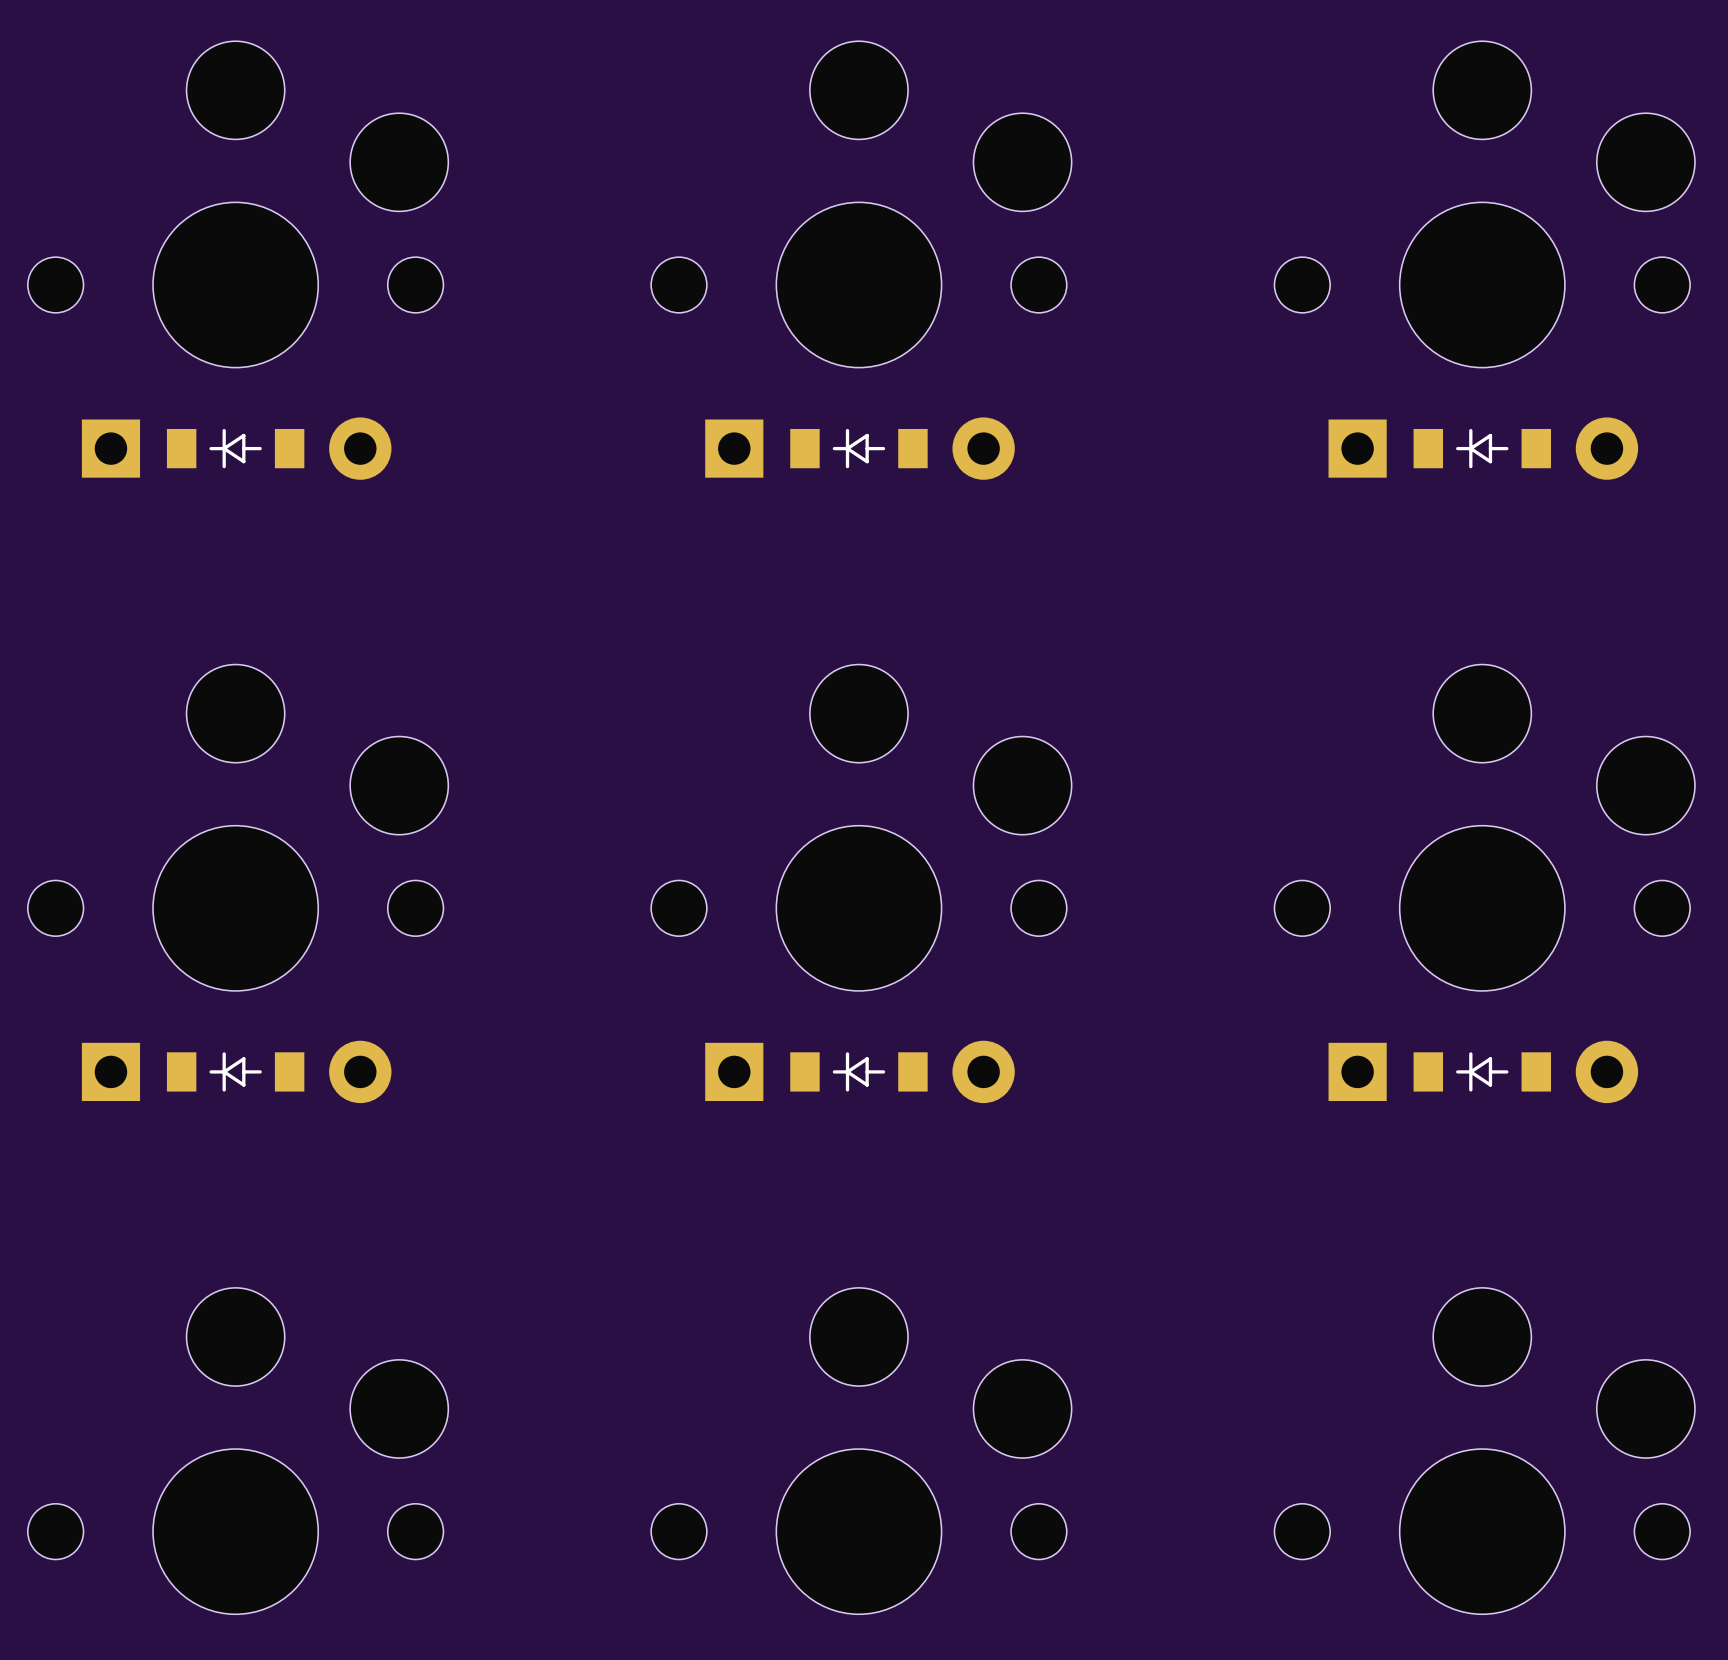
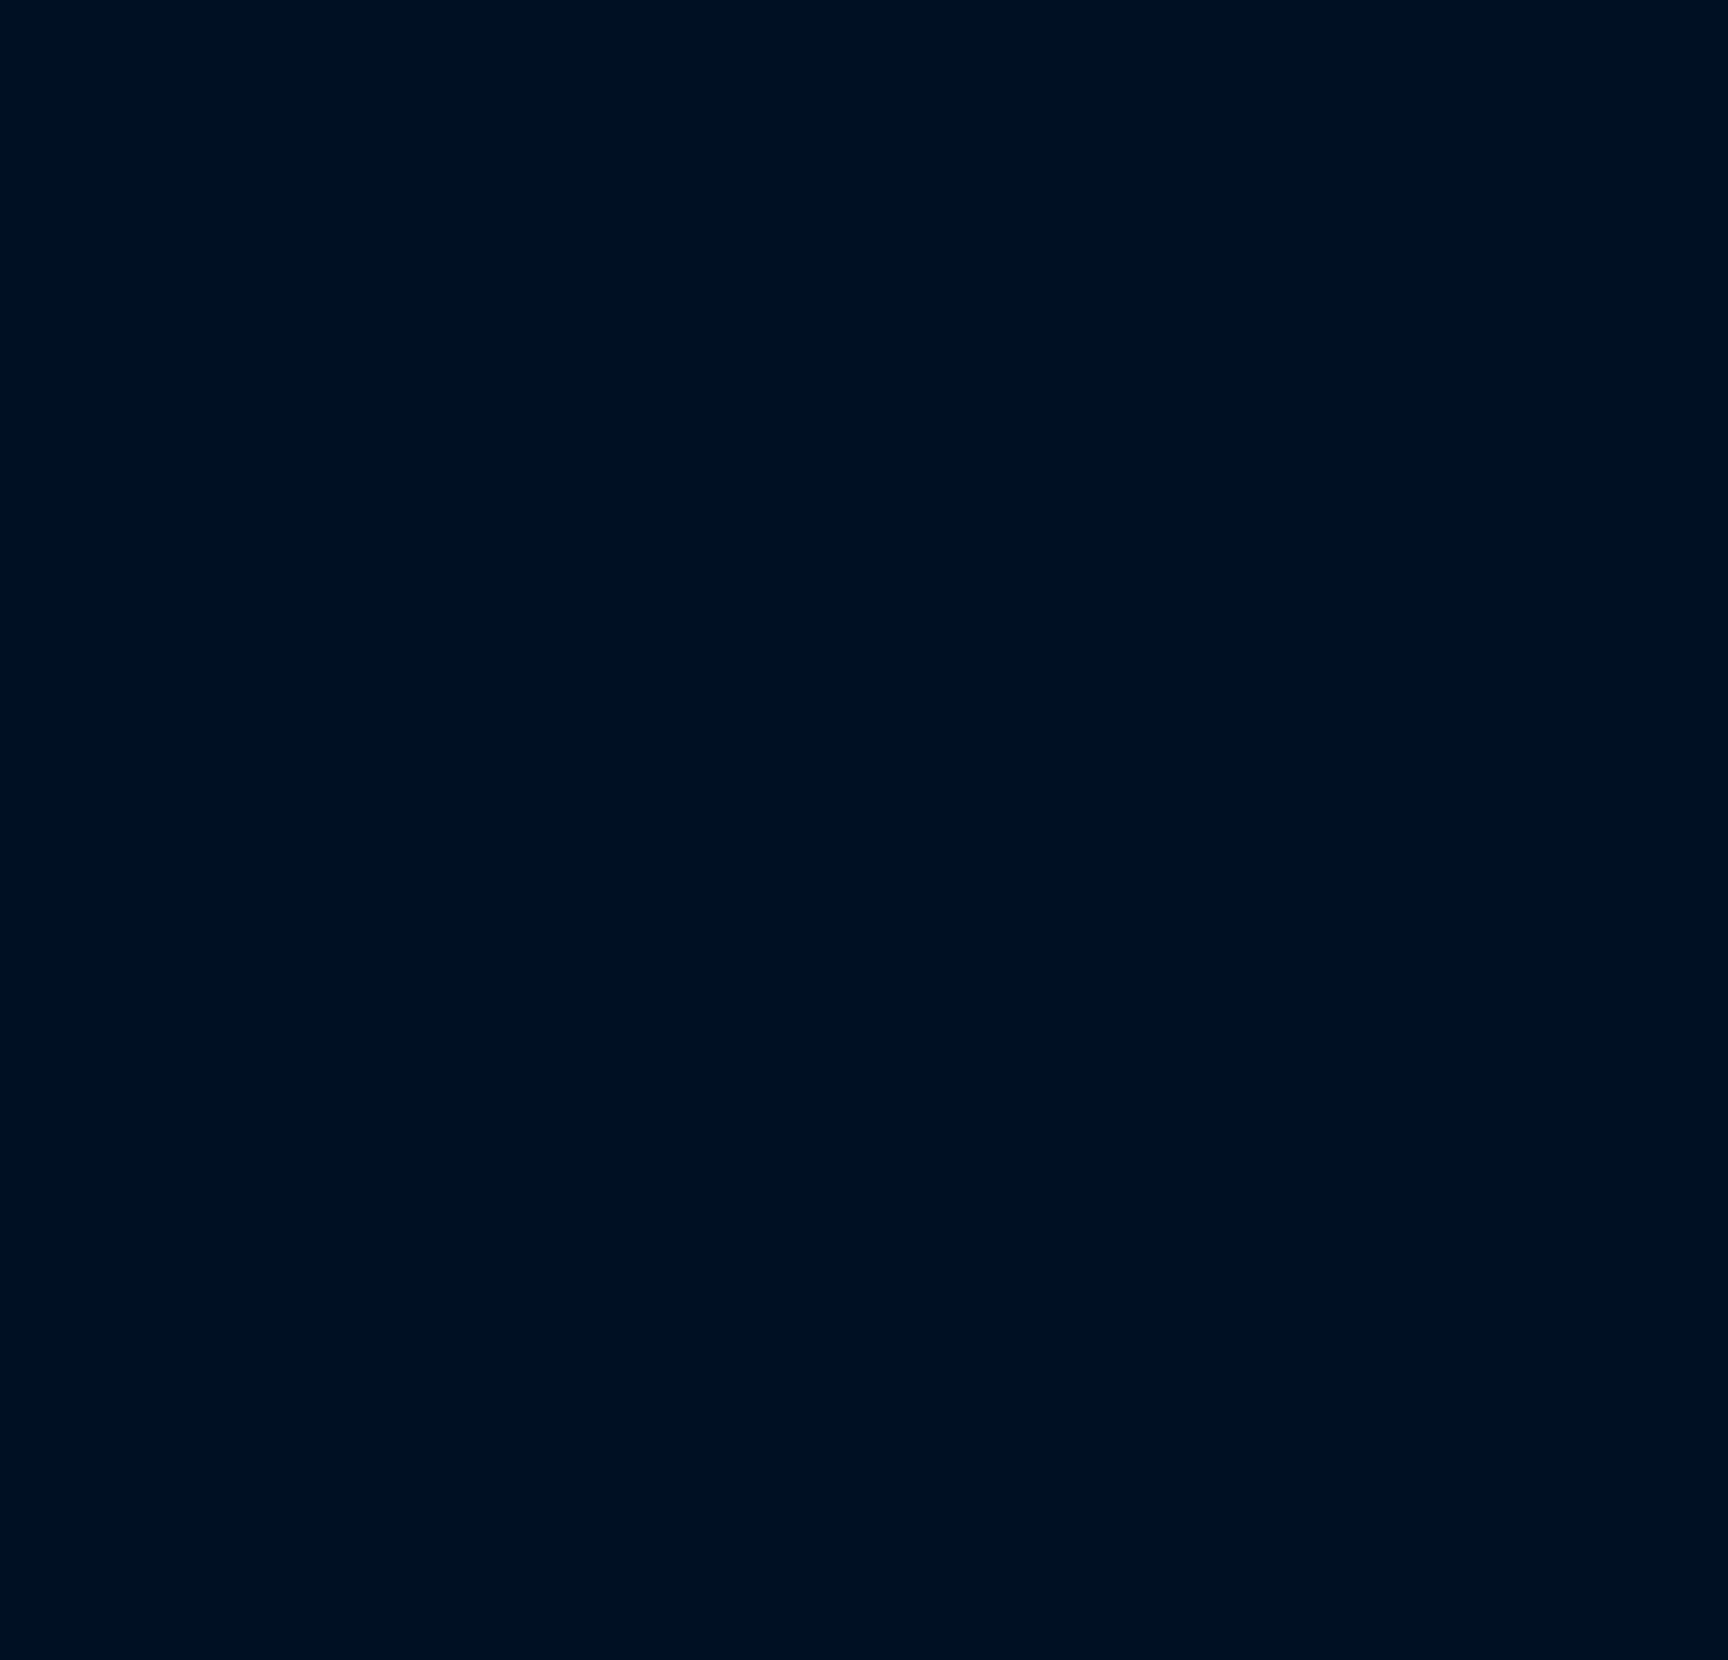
part: (238, 204) -> none
part: (861, 204) -> none
part: (1484, 204) -> none
part: (236, 448) -> none
part: (859, 448) -> none
part: (1483, 448) -> none
part: (238, 827) -> none
part: (861, 827) -> none
part: (1484, 827) -> none
part: (236, 1071) -> none
part: (859, 1071) -> none
part: (1483, 1071) -> none
part: (238, 1451) -> none
part: (861, 1451) -> none
part: (1484, 1451) -> none

